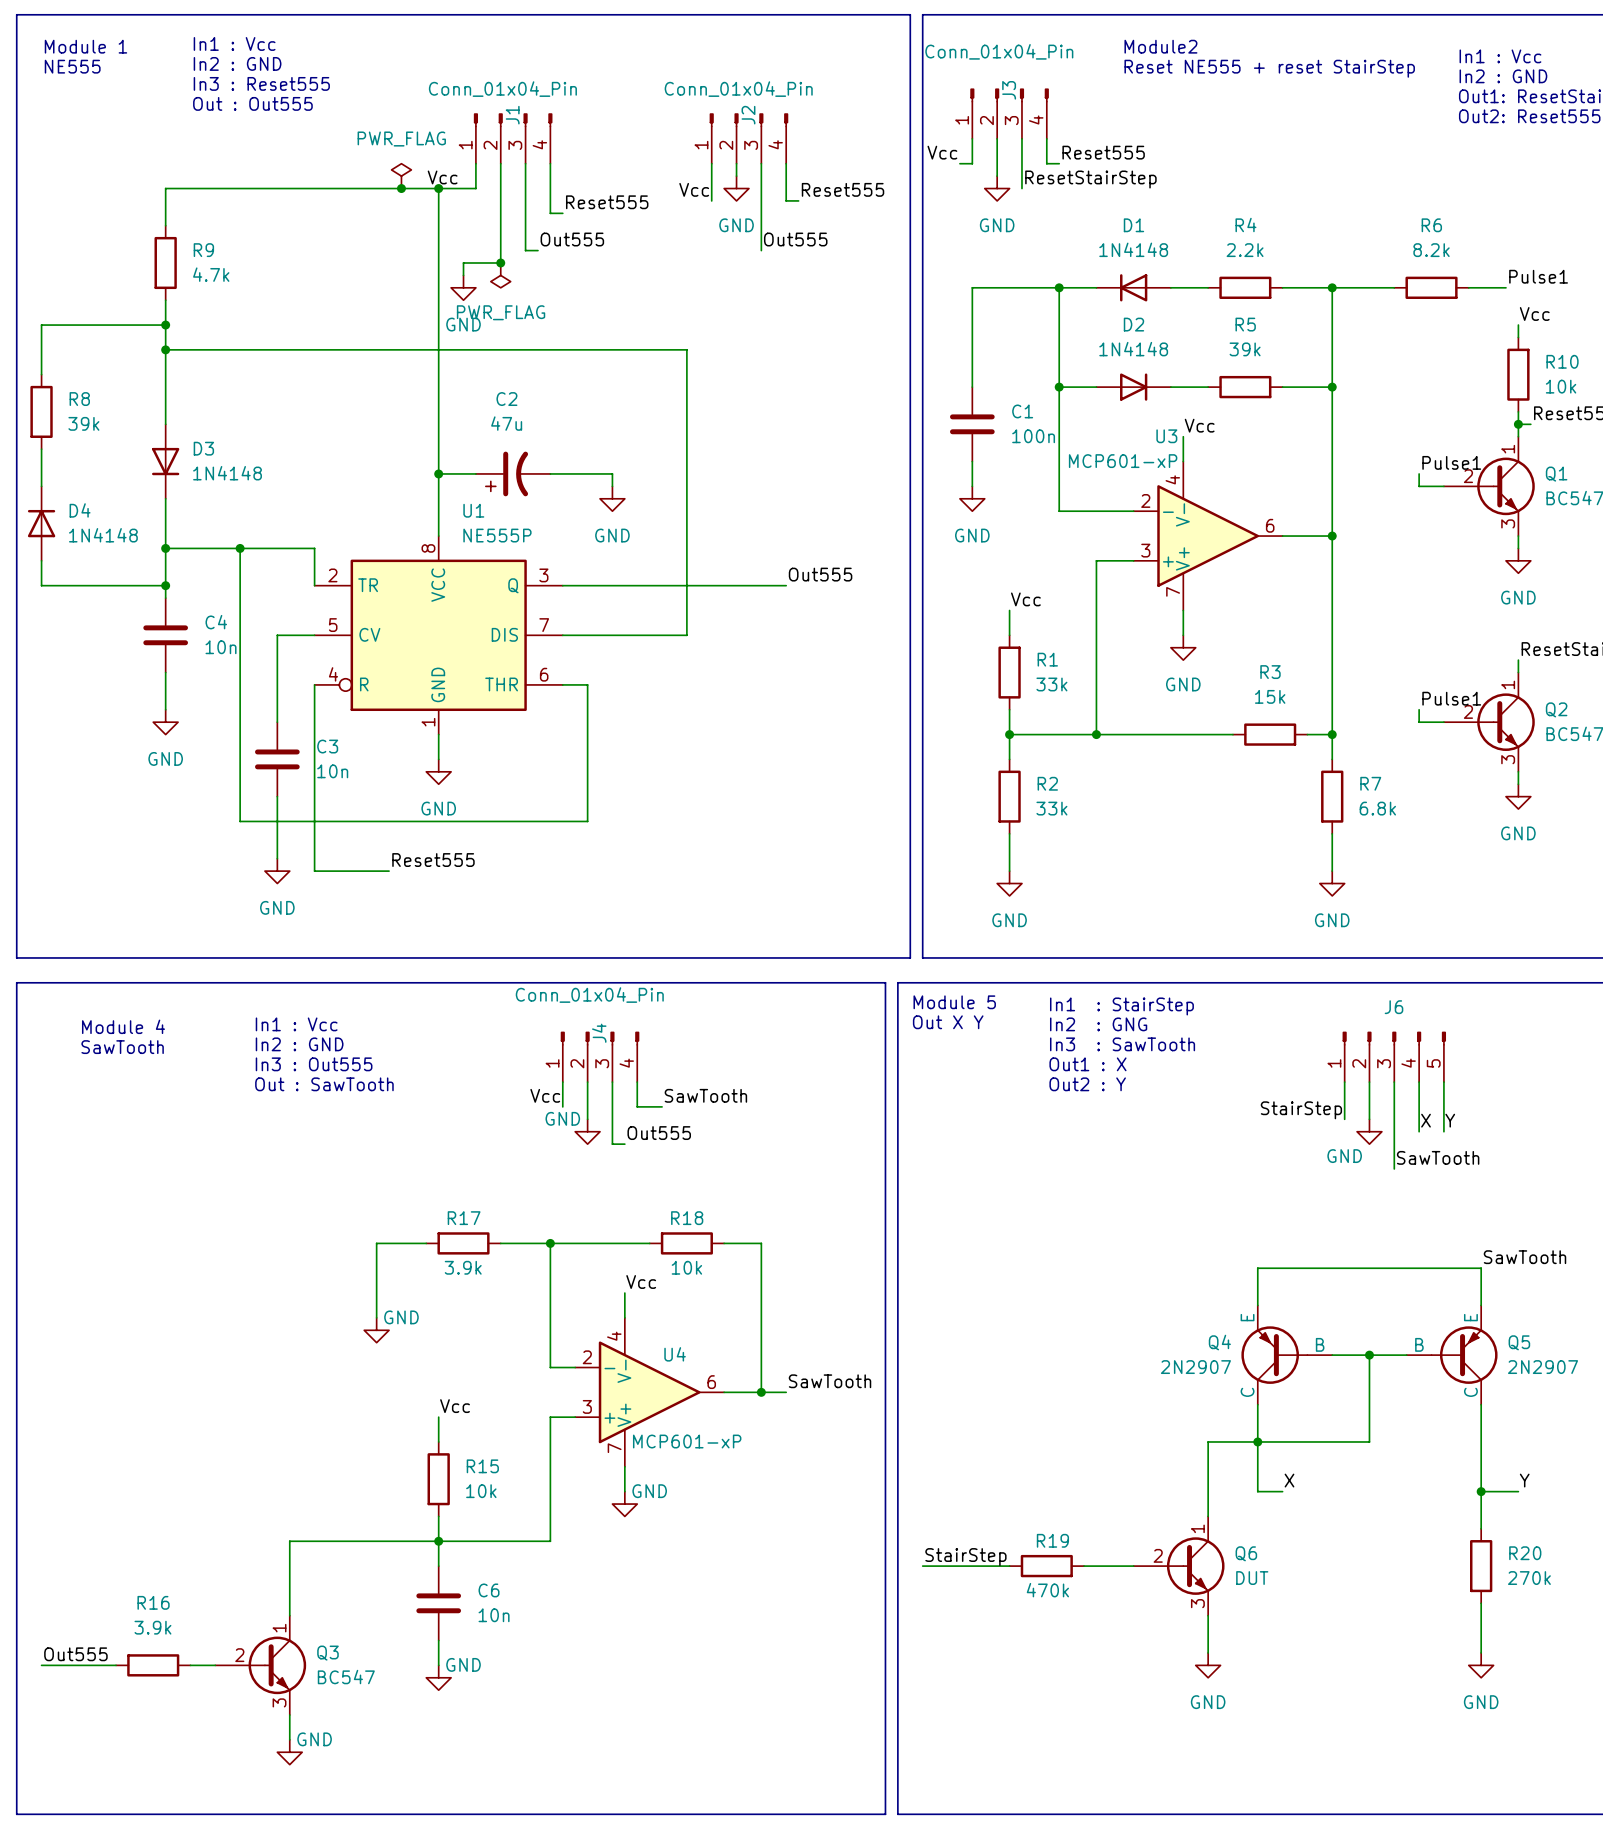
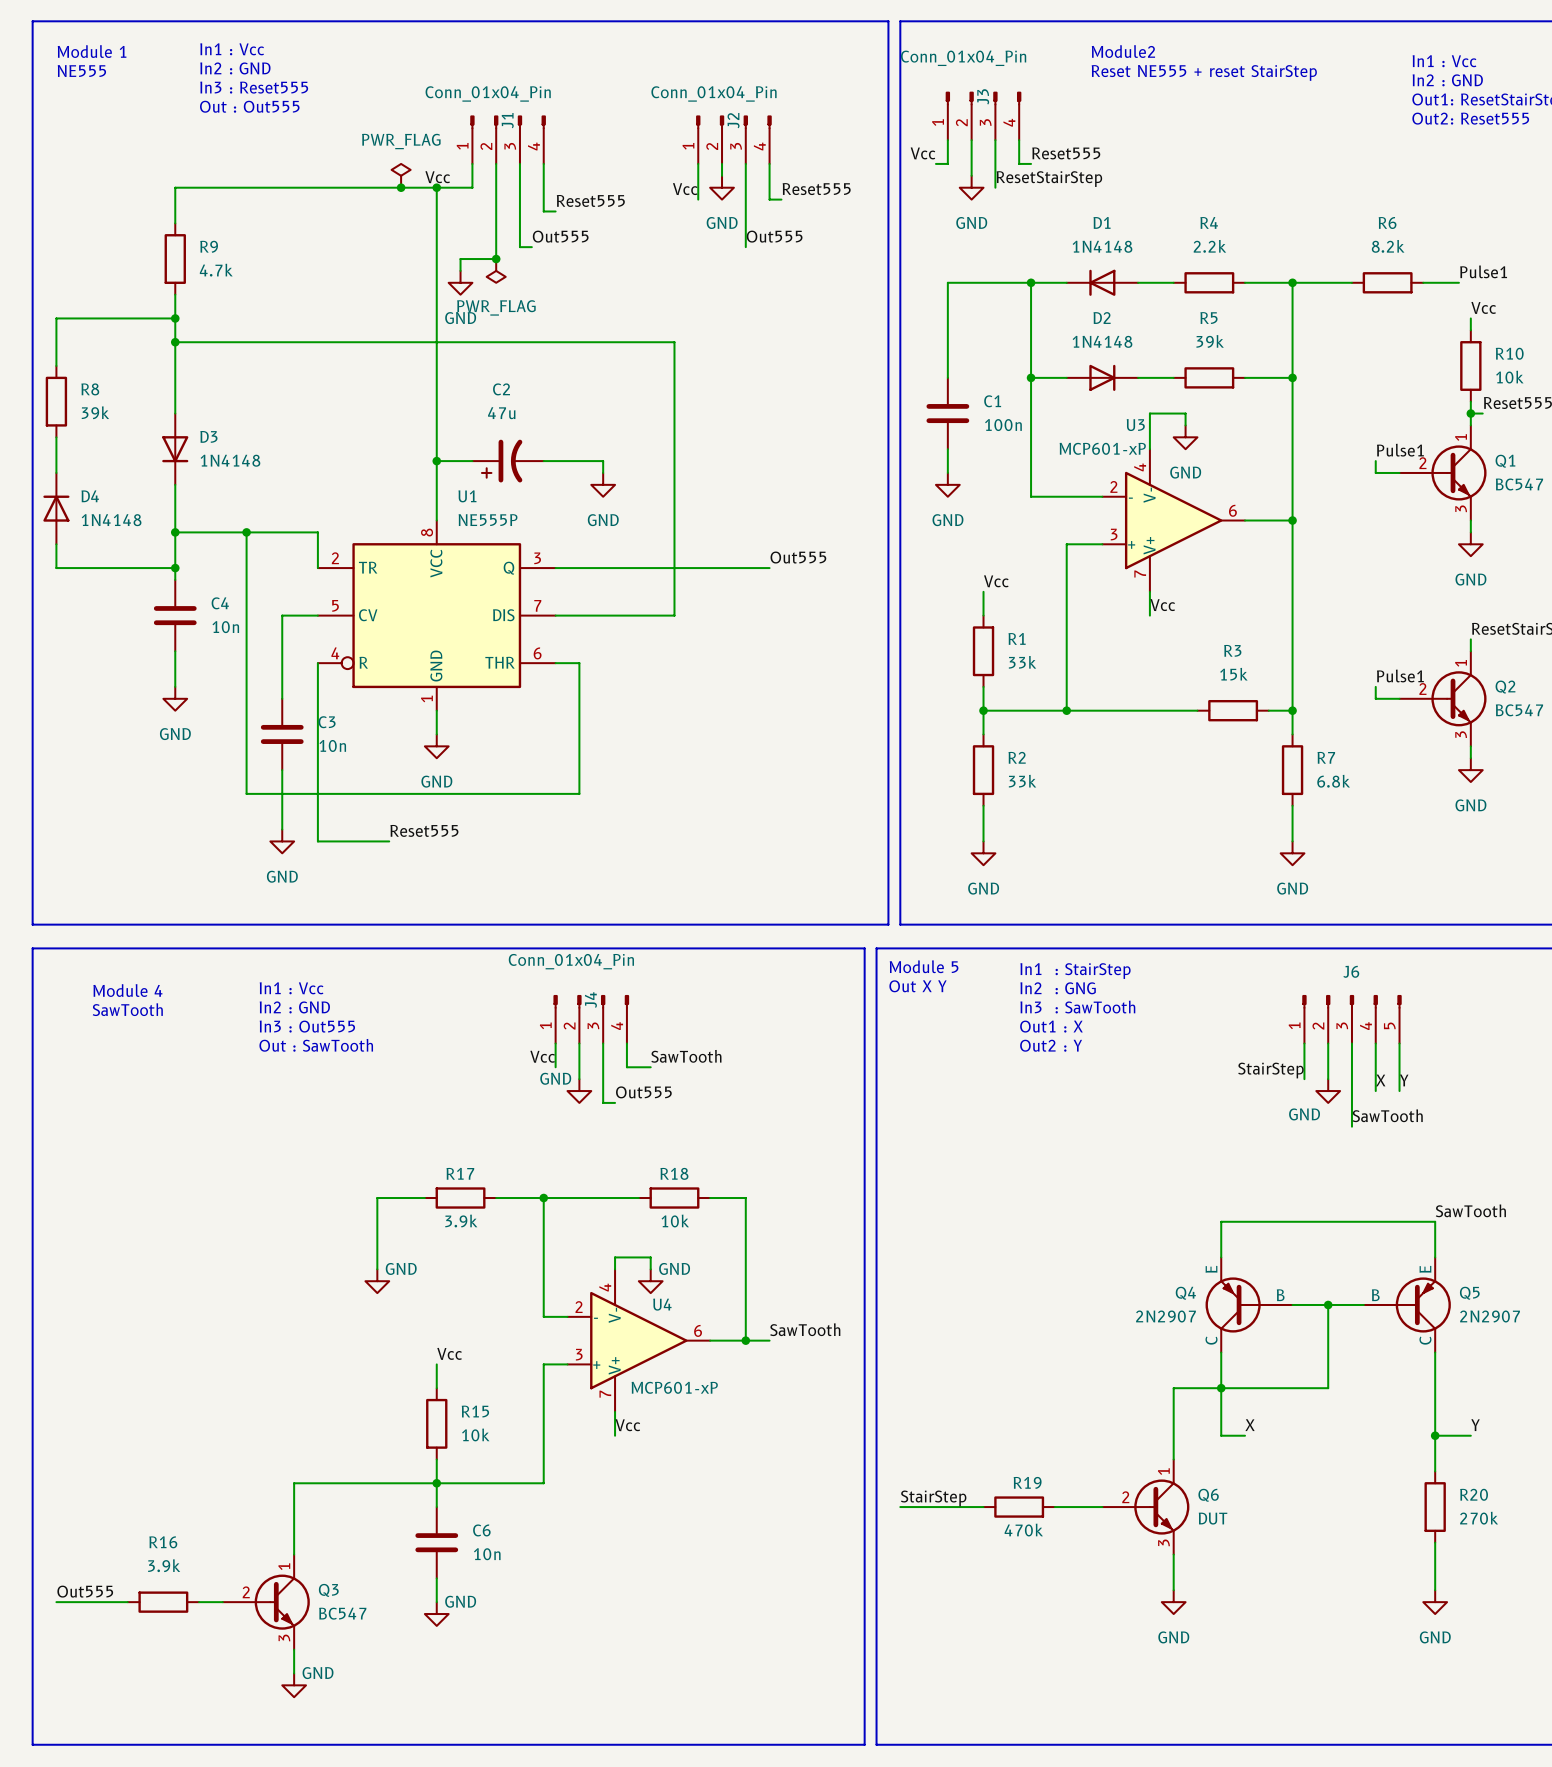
label position: Vcc (1199, 425) -> Vcc (1162, 605)
wire: none -> (1149, 425) (1149, 413) (1185, 413) (1185, 425)
power symbol position: GND (1183, 647) -> GND (1185, 437)
label position: Vcc (641, 1281) -> Vcc (627, 1425)
wire: (624, 1293) (624, 1305) -> (650, 1269) (650, 1257) (615, 1257)
power symbol position: GND (624, 1504) -> GND (650, 1281)

